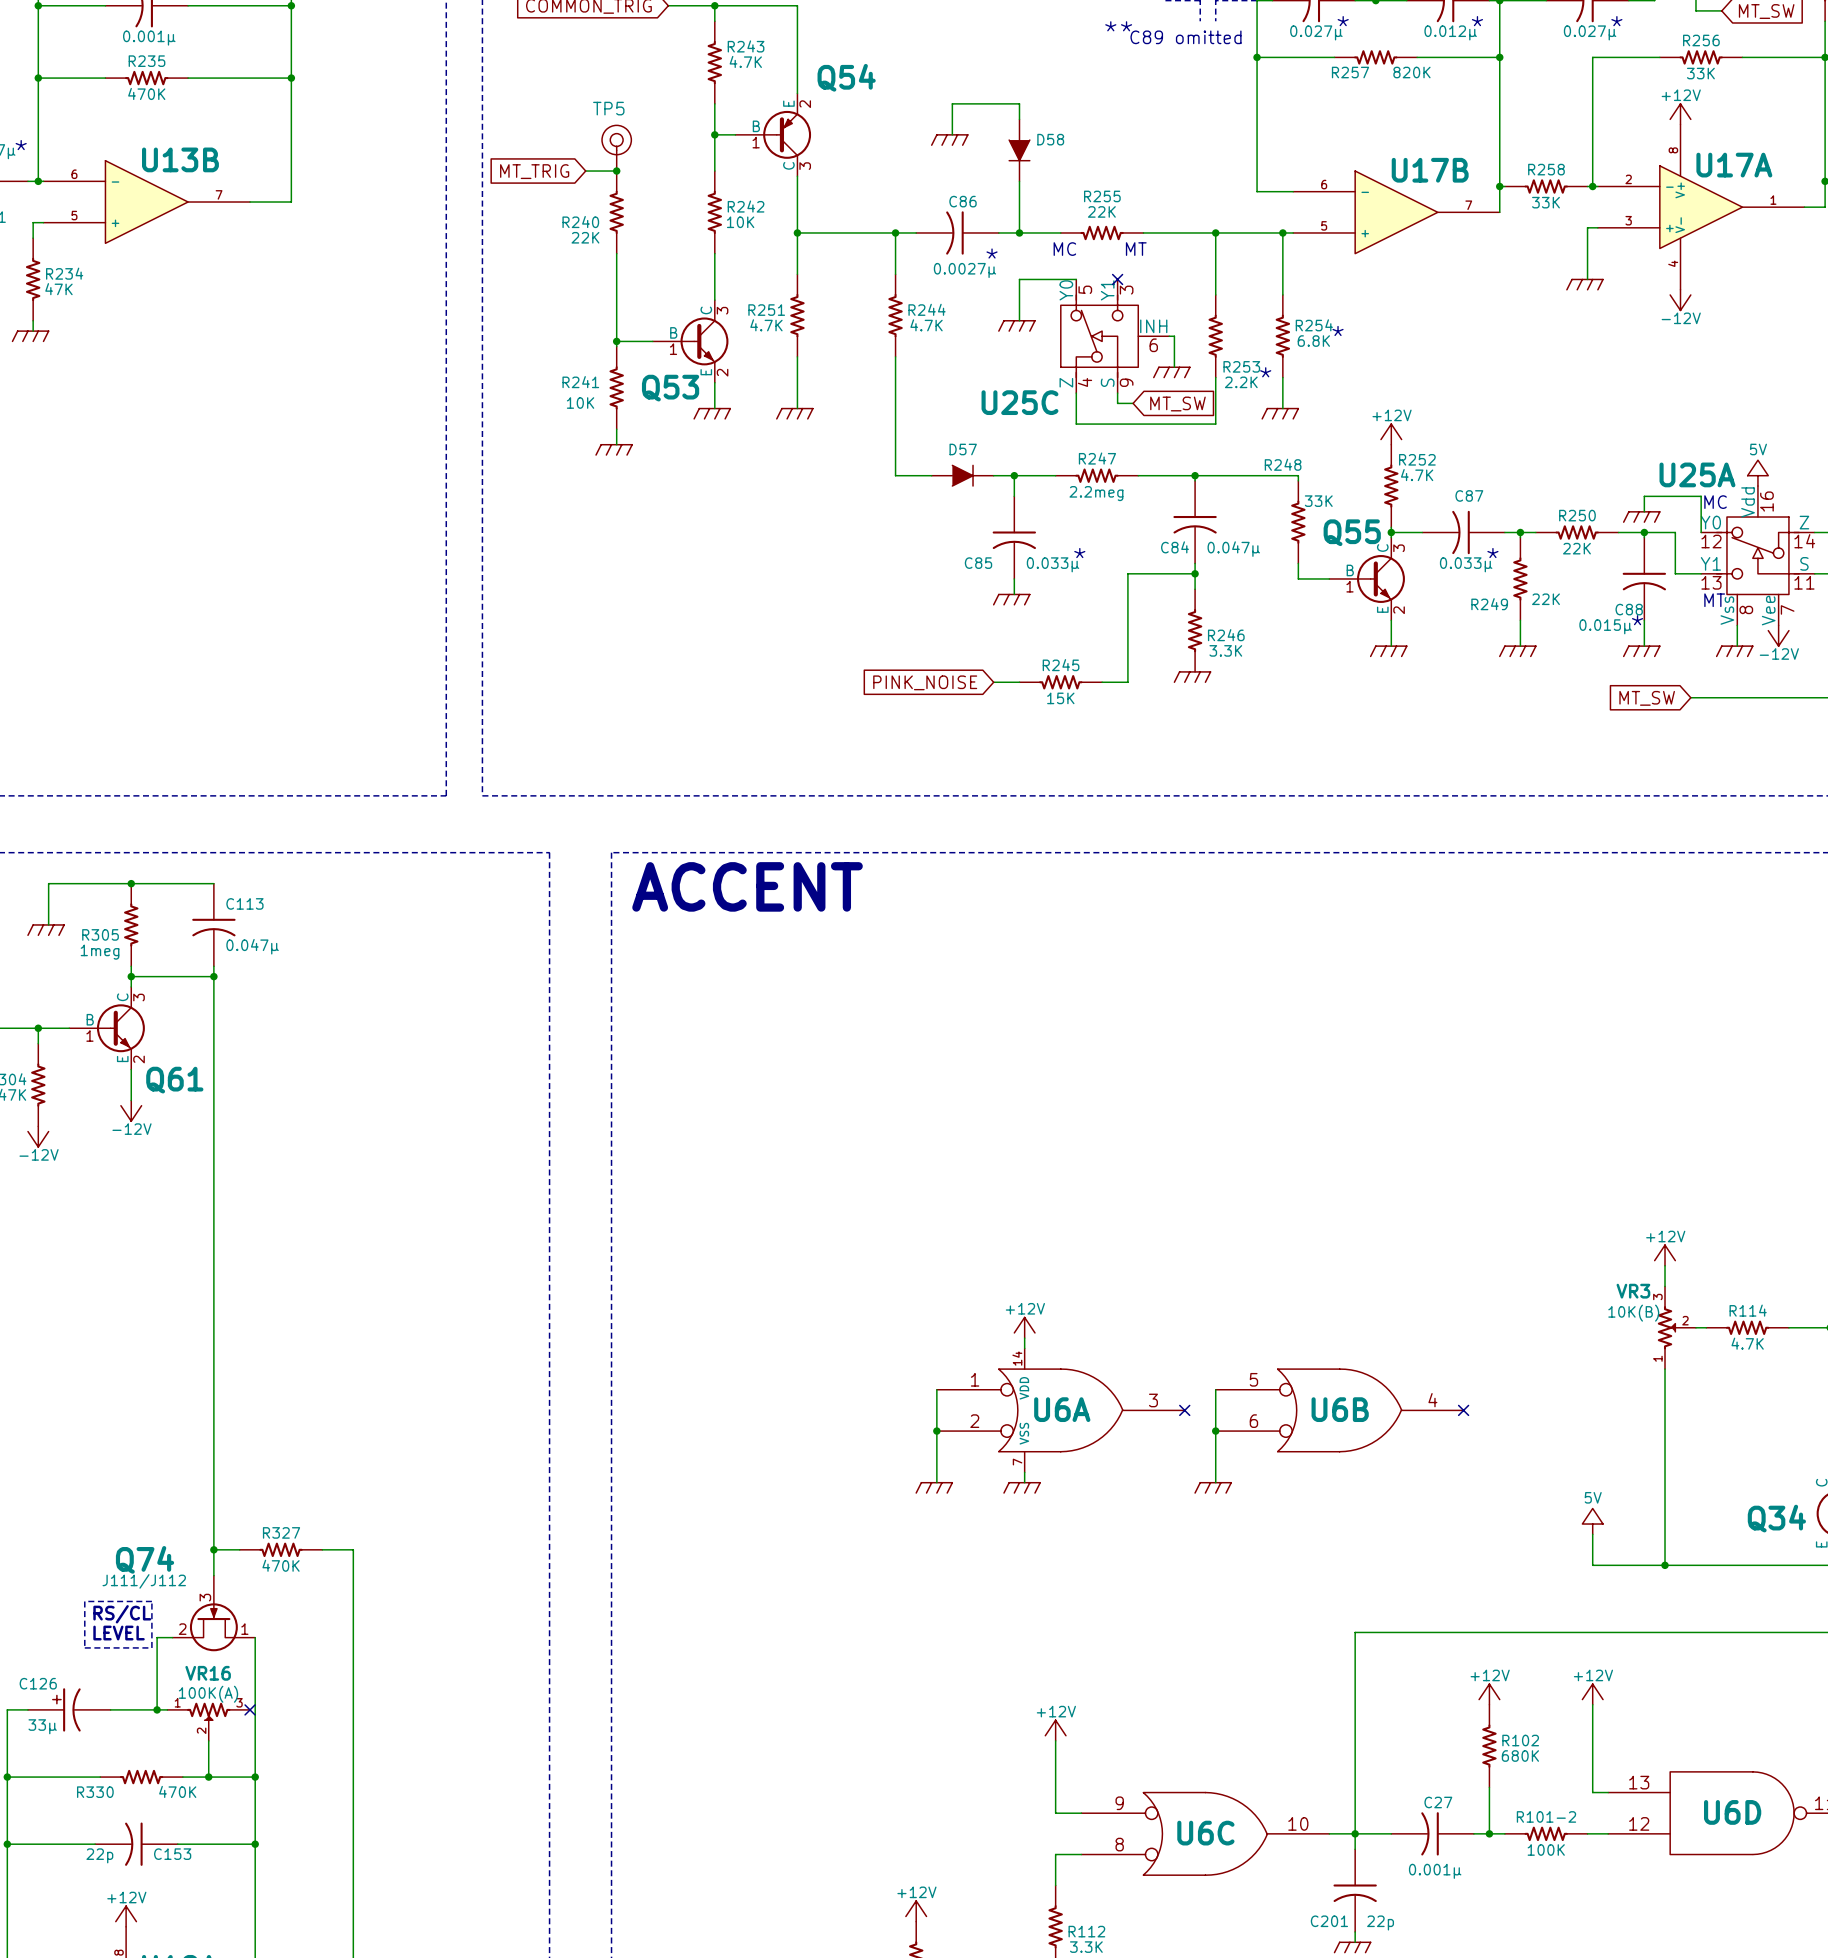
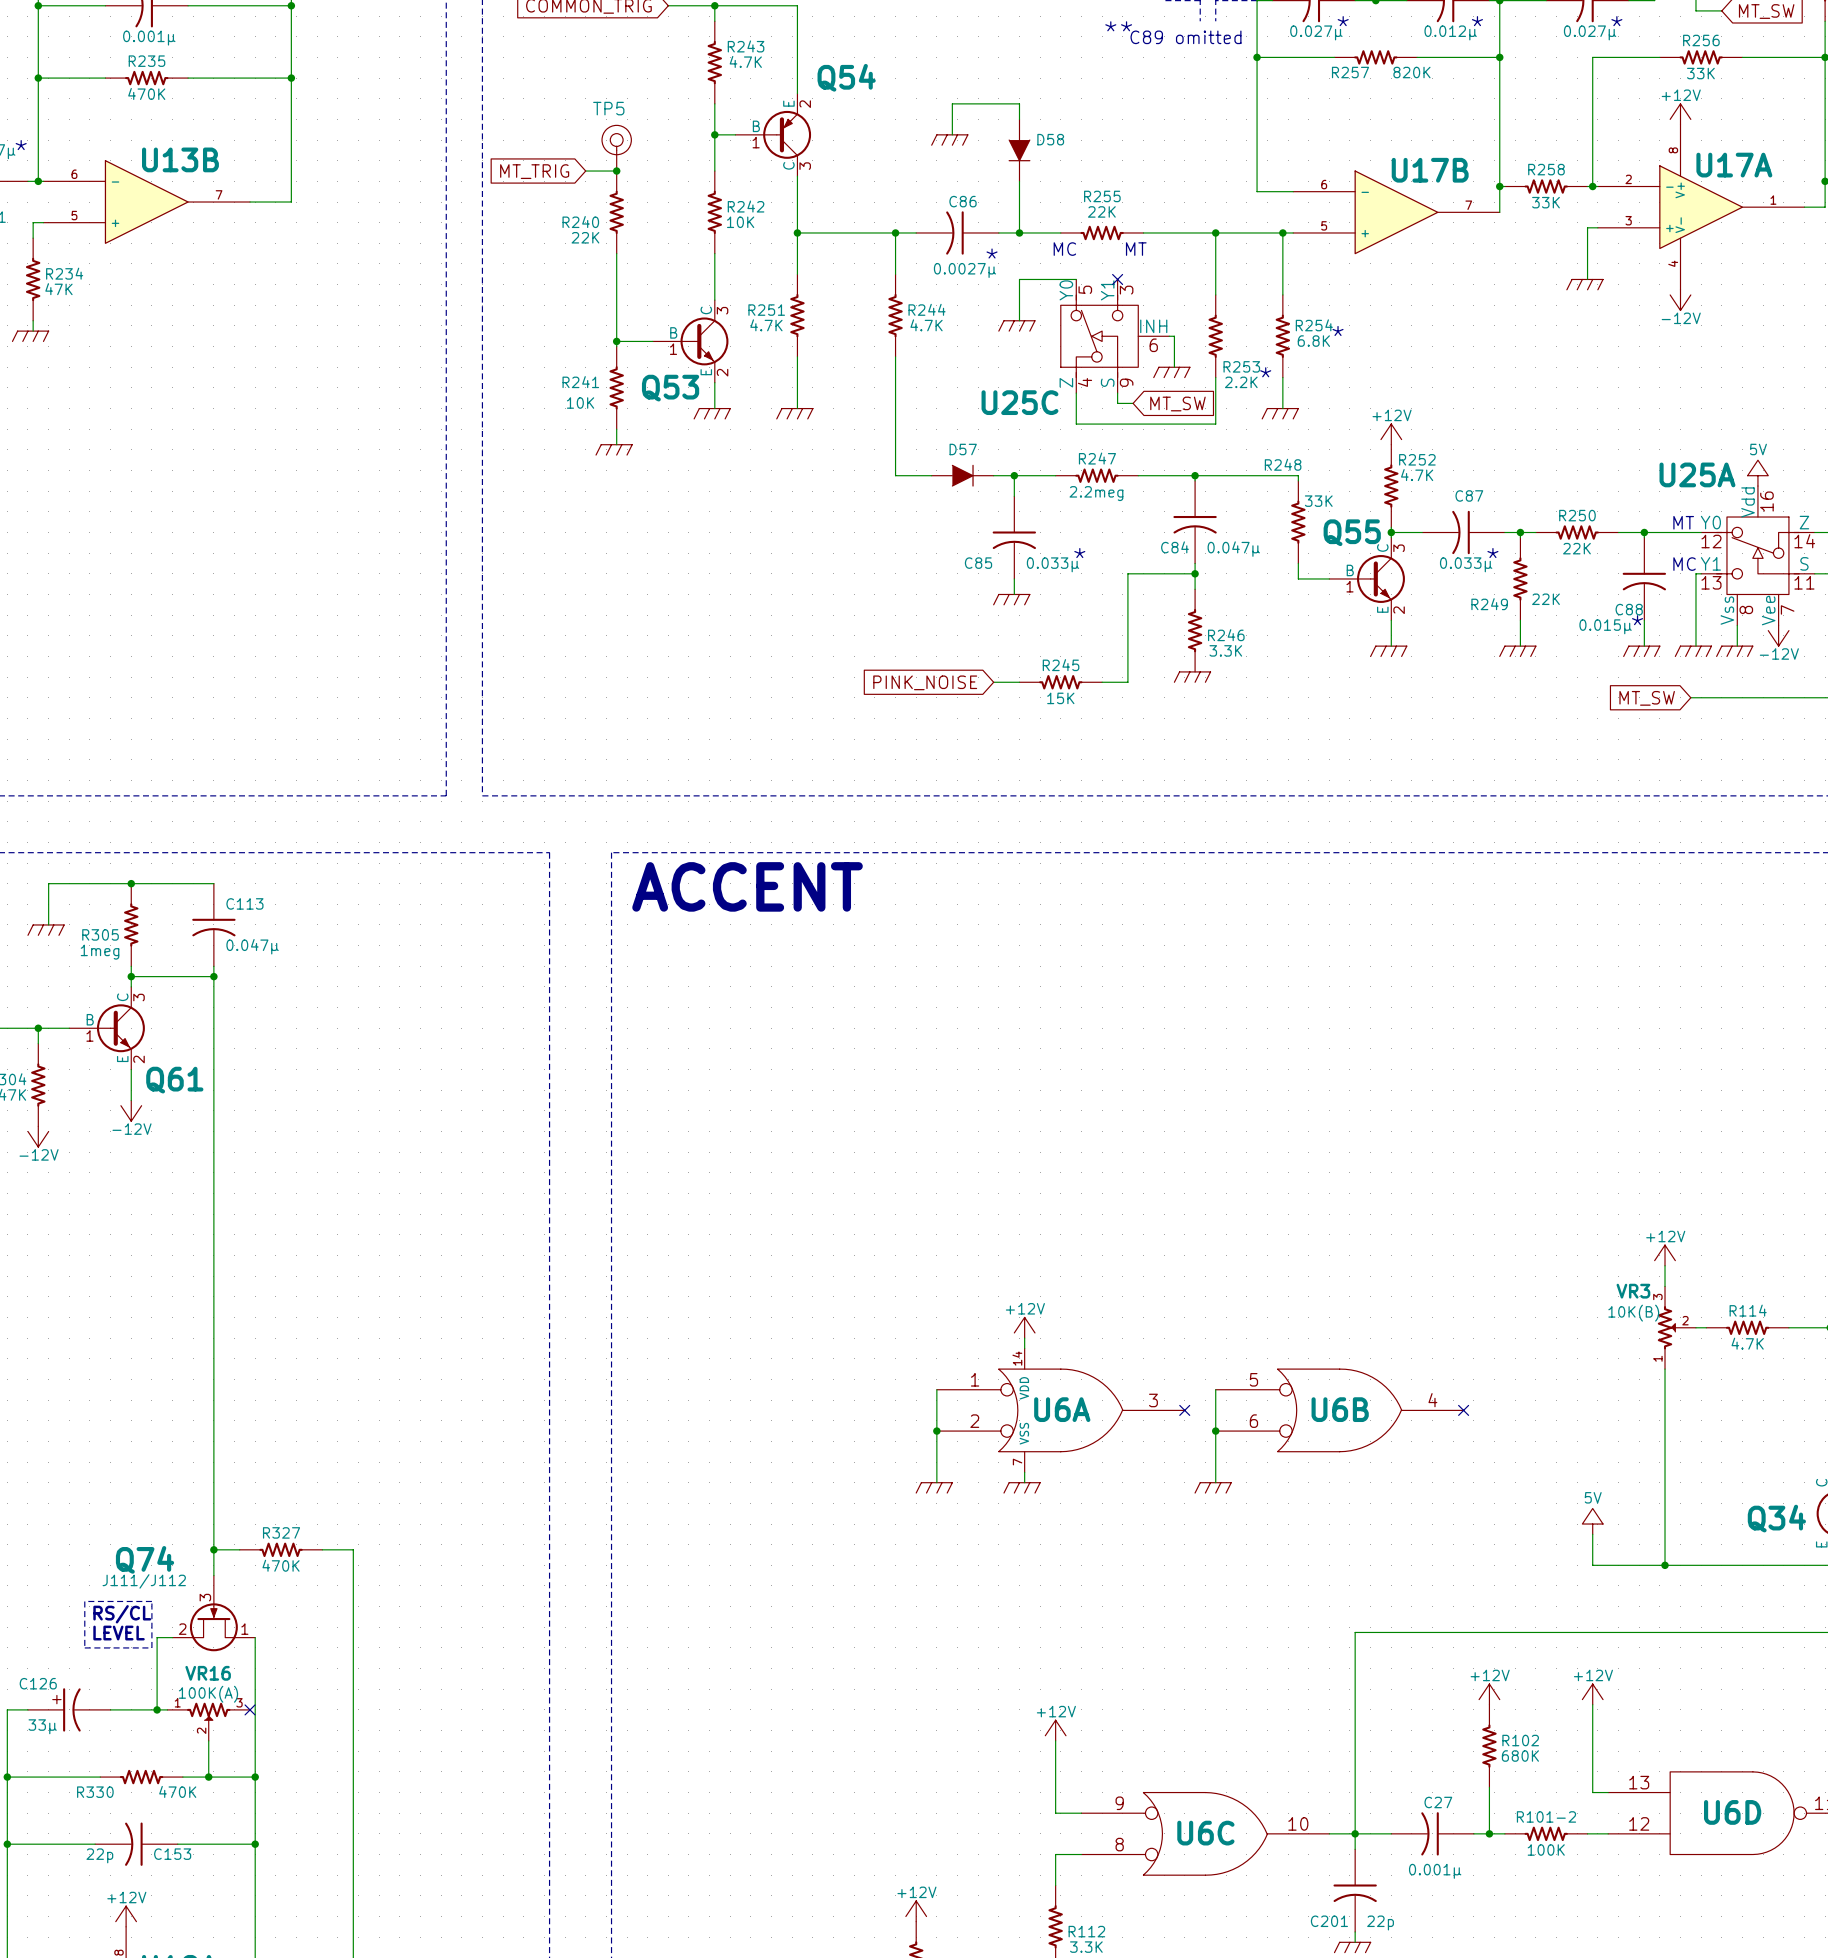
text position: MC (1715, 502) -> MC (1684, 564)
wire: (1644, 511) (1644, 496) (1701, 496) (1701, 532) -> (1675, 532) (1701, 532)
power symbol position: (1641, 517) -> (1693, 651)
wire: (1675, 532) (1675, 573) (1695, 573) -> (1695, 646) (1695, 573)
text position: MT (1714, 600) -> MT (1683, 522)

